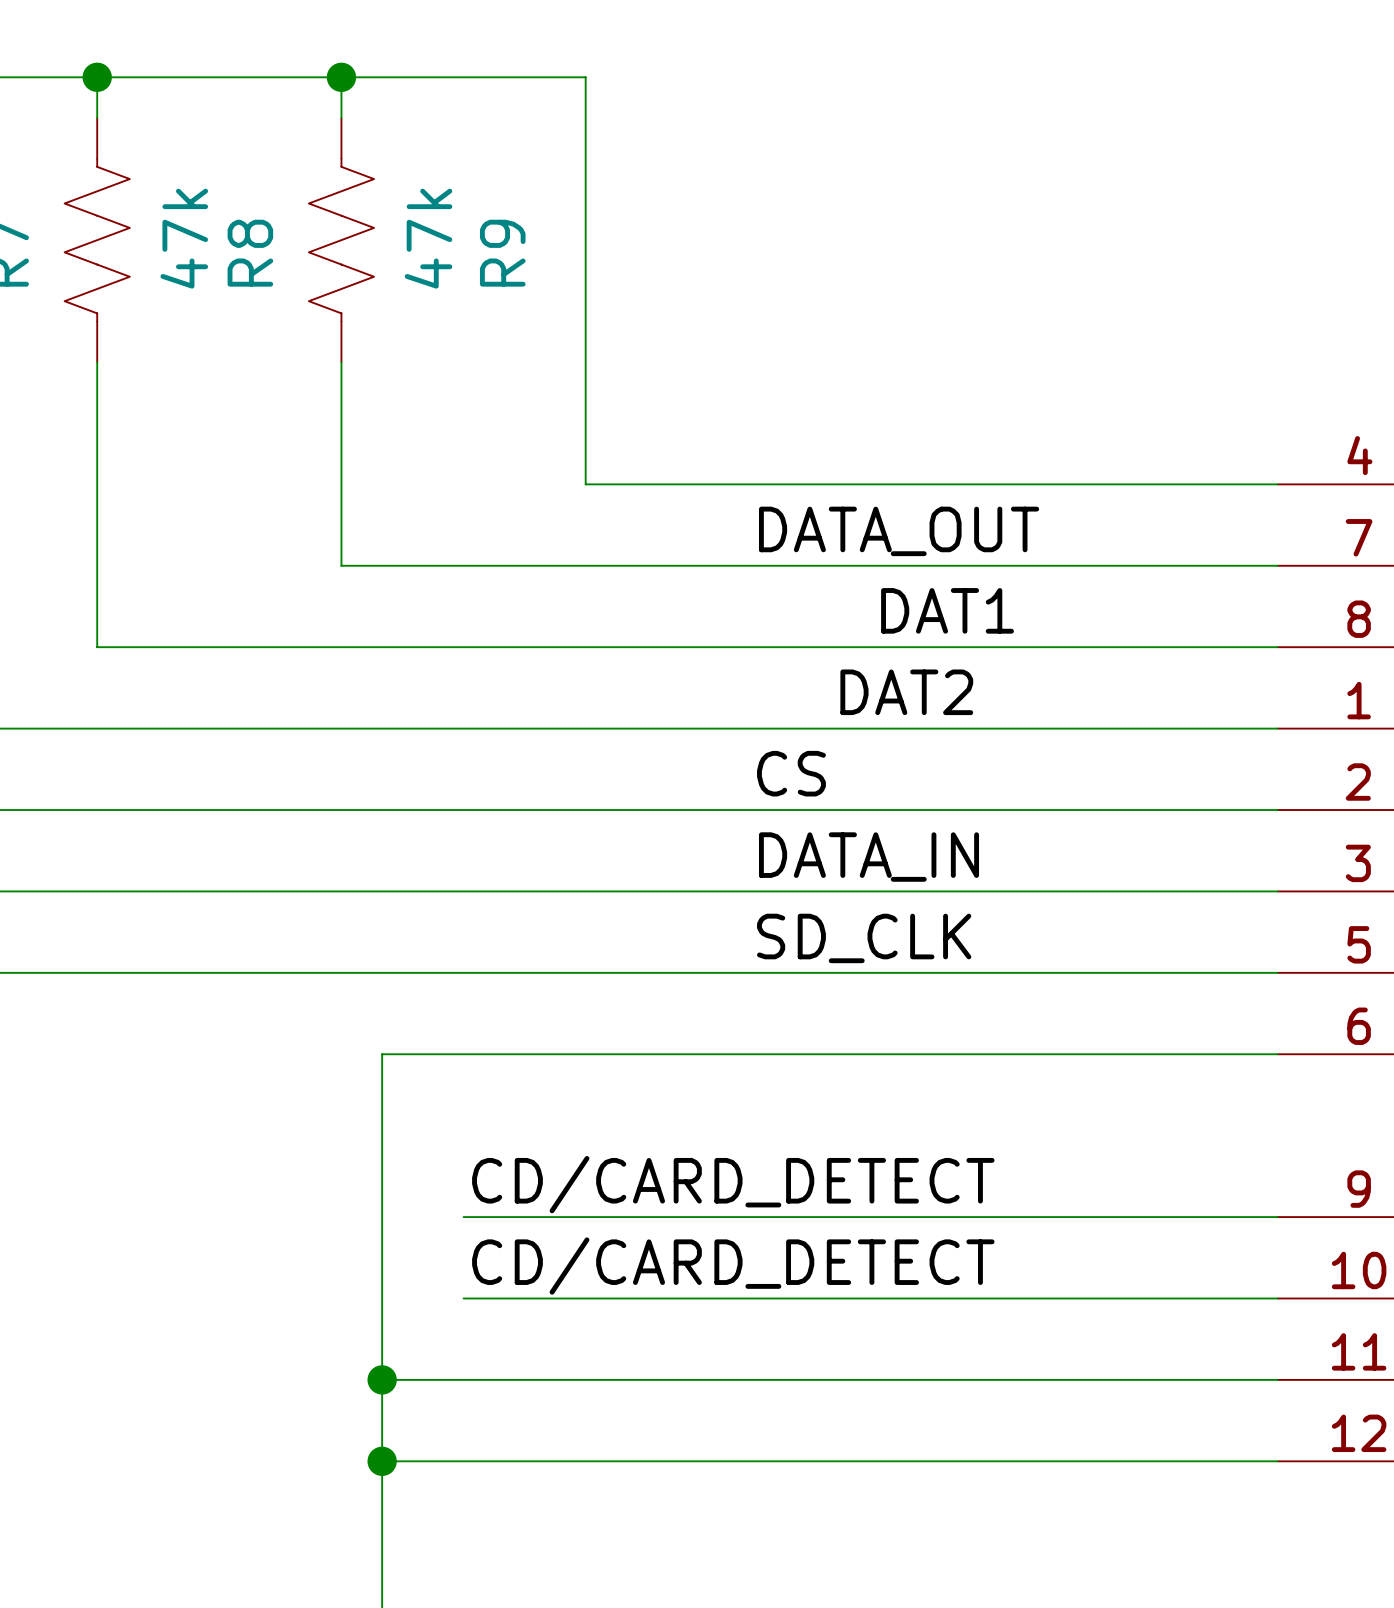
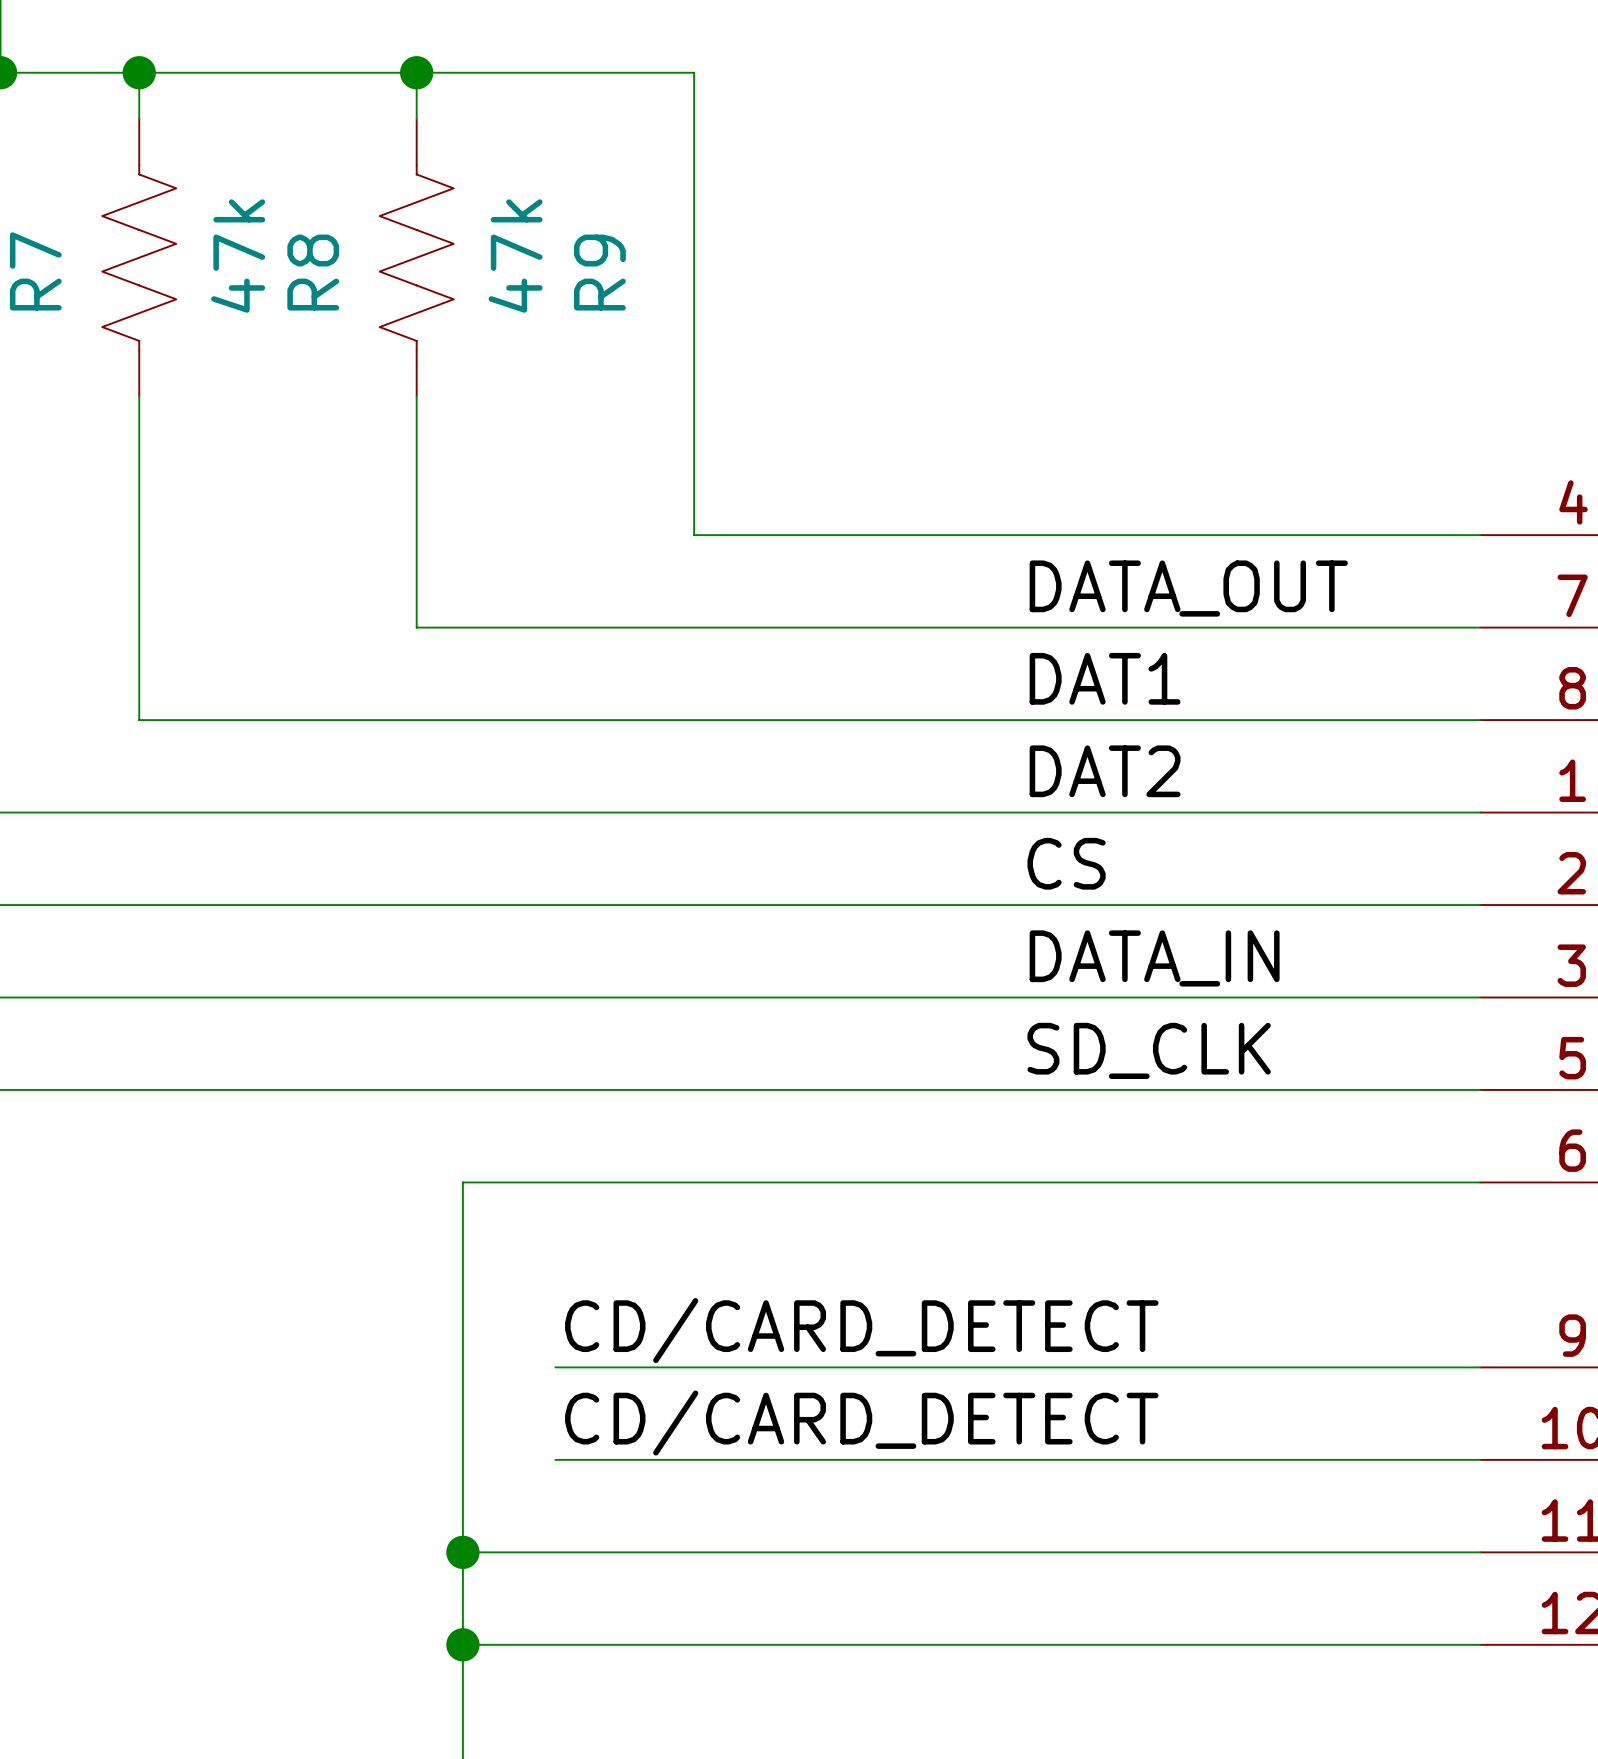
label position: DATA_OUT (899, 531) -> DATA_OUT (1188, 588)
label position: DAT2 (906, 692) -> DAT2 (1105, 771)
label position: CS (791, 773) -> CS (1066, 863)
label position: DATA_IN (869, 857) -> DATA_IN (1154, 958)
label position: SD_CLK (864, 938) -> SD_CLK (1149, 1050)

